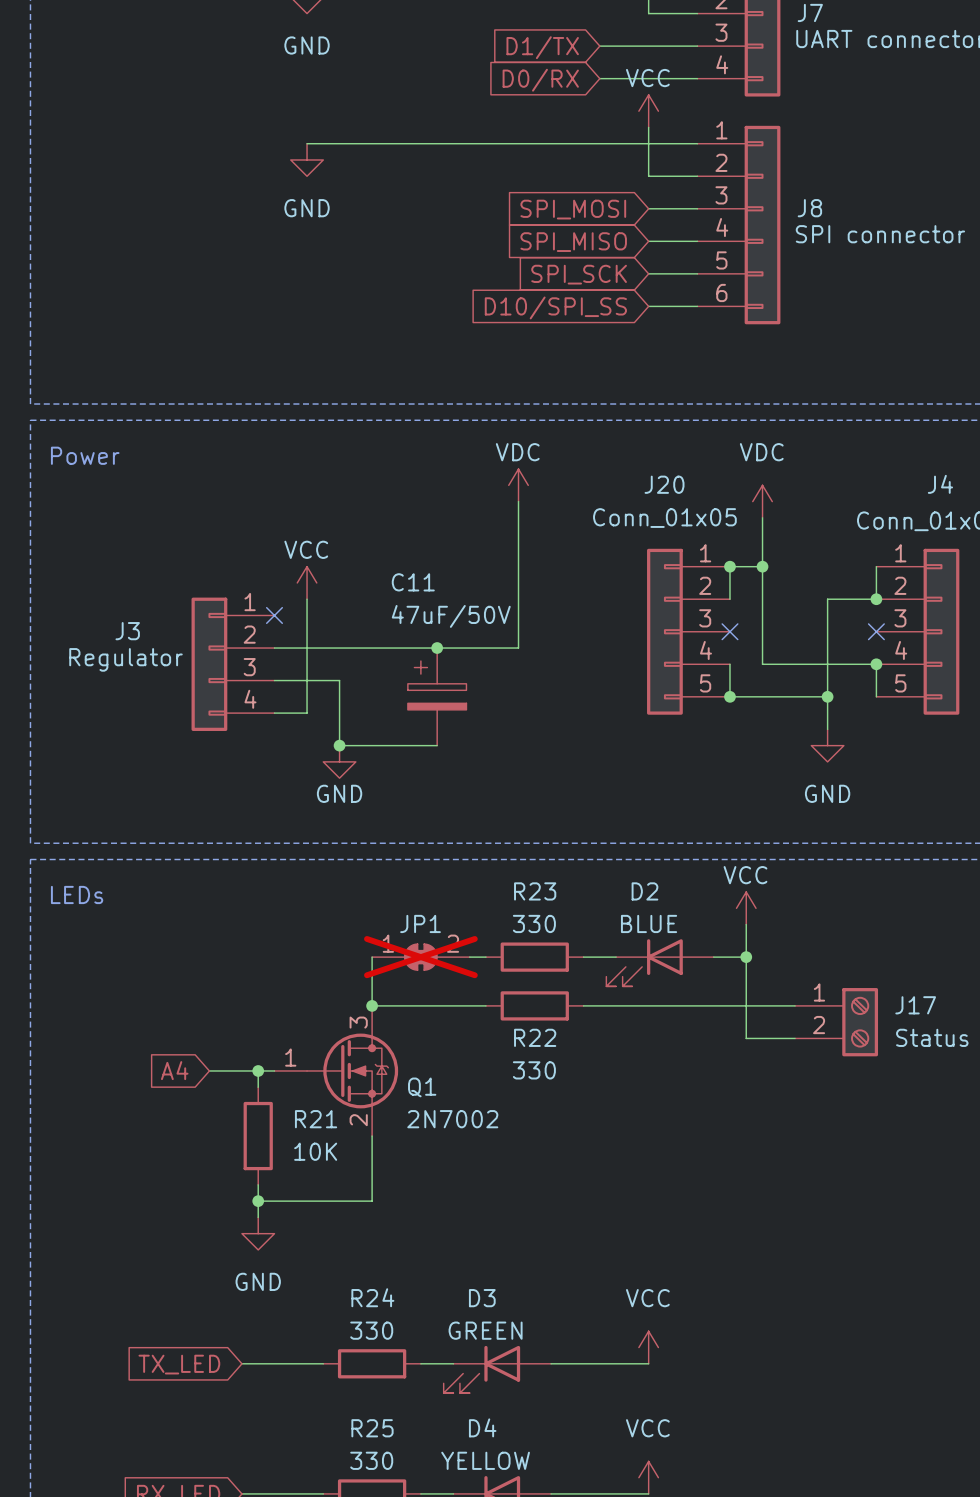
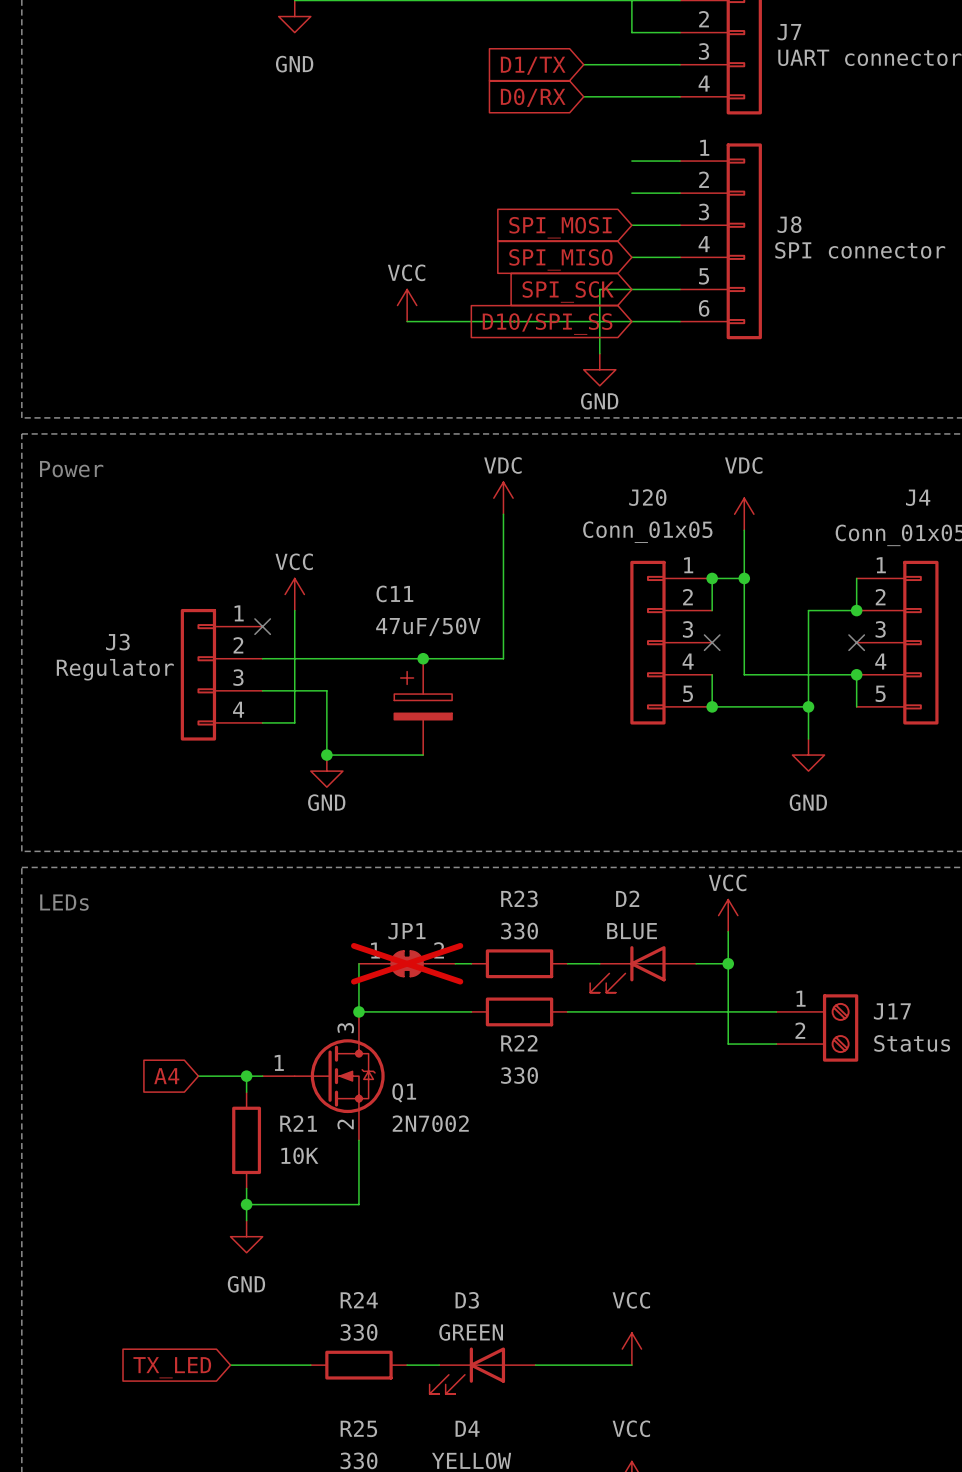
power symbol position: VCC (648, 111) -> VCC (407, 305)
wire: (648, 127) (648, 176) -> none
wire: (307, 143) (648, 143) -> none
power symbol: GND (307, 159) -> none
wire: none -> (631, 289) (599, 289) (599, 353)
wire: none -> (407, 321) (631, 321)
power symbol: none -> GND (599, 369)

